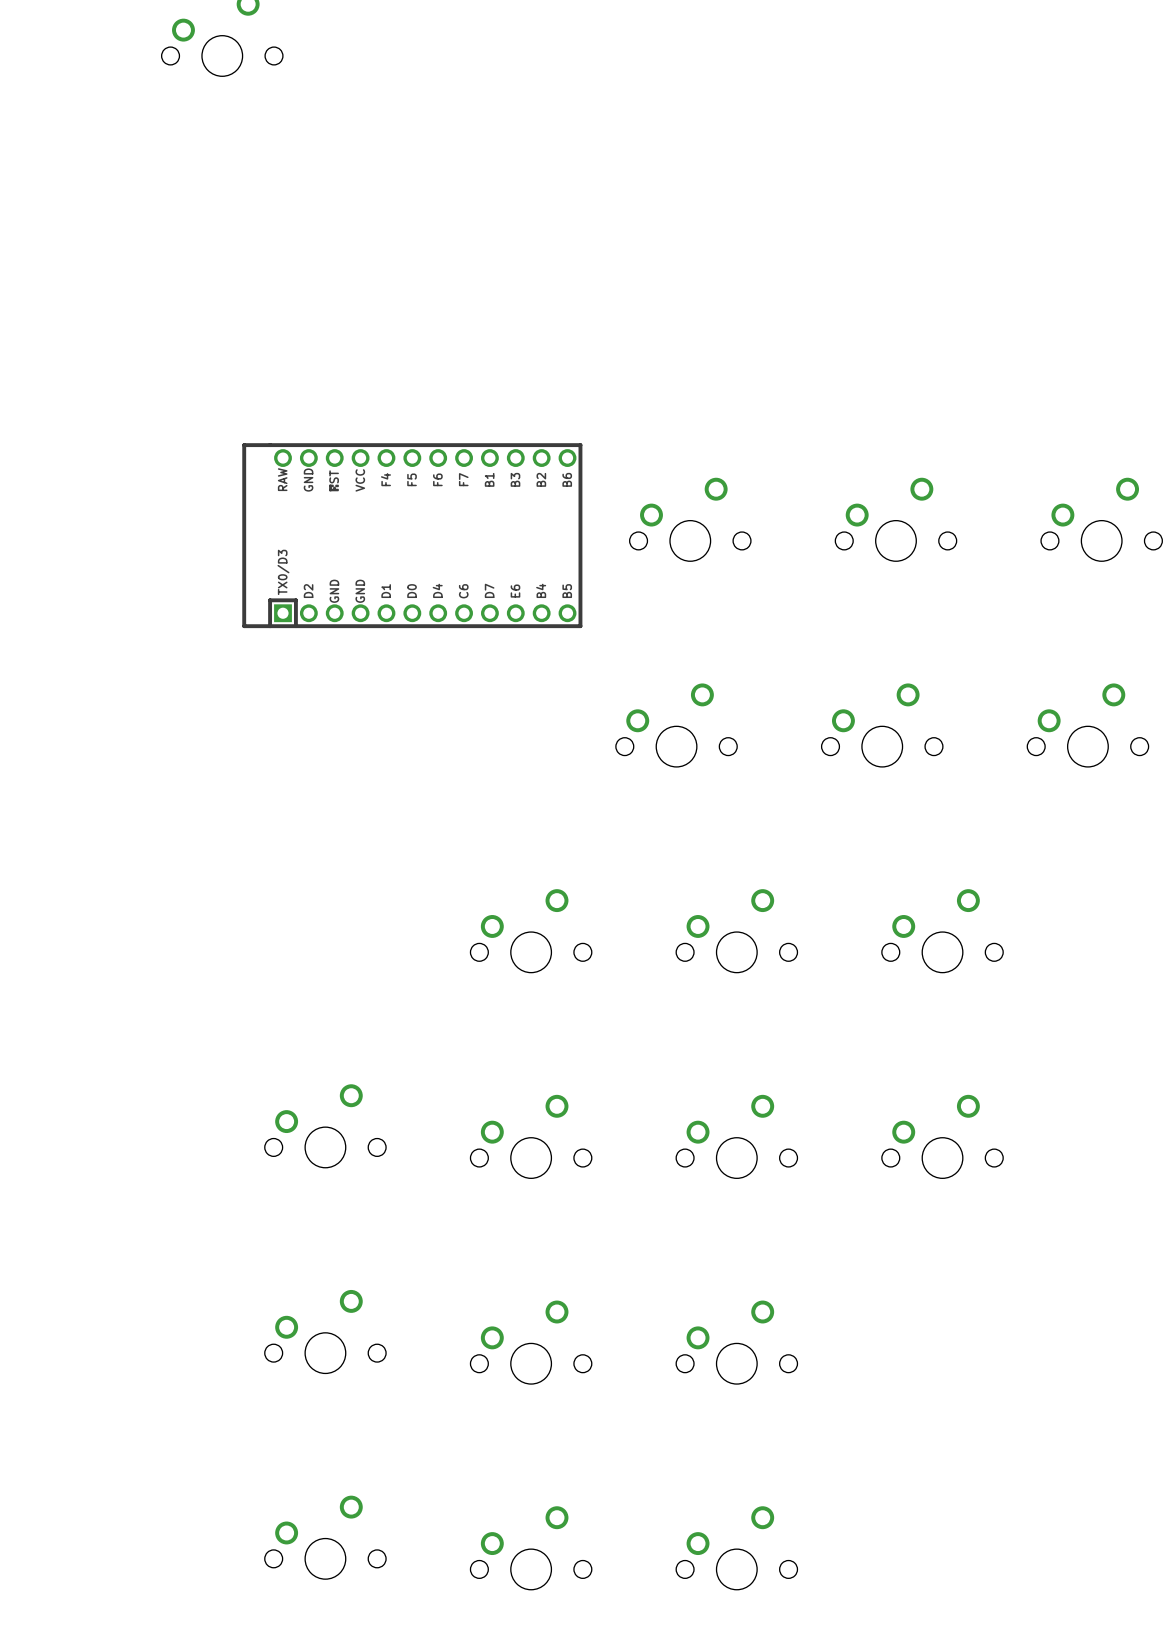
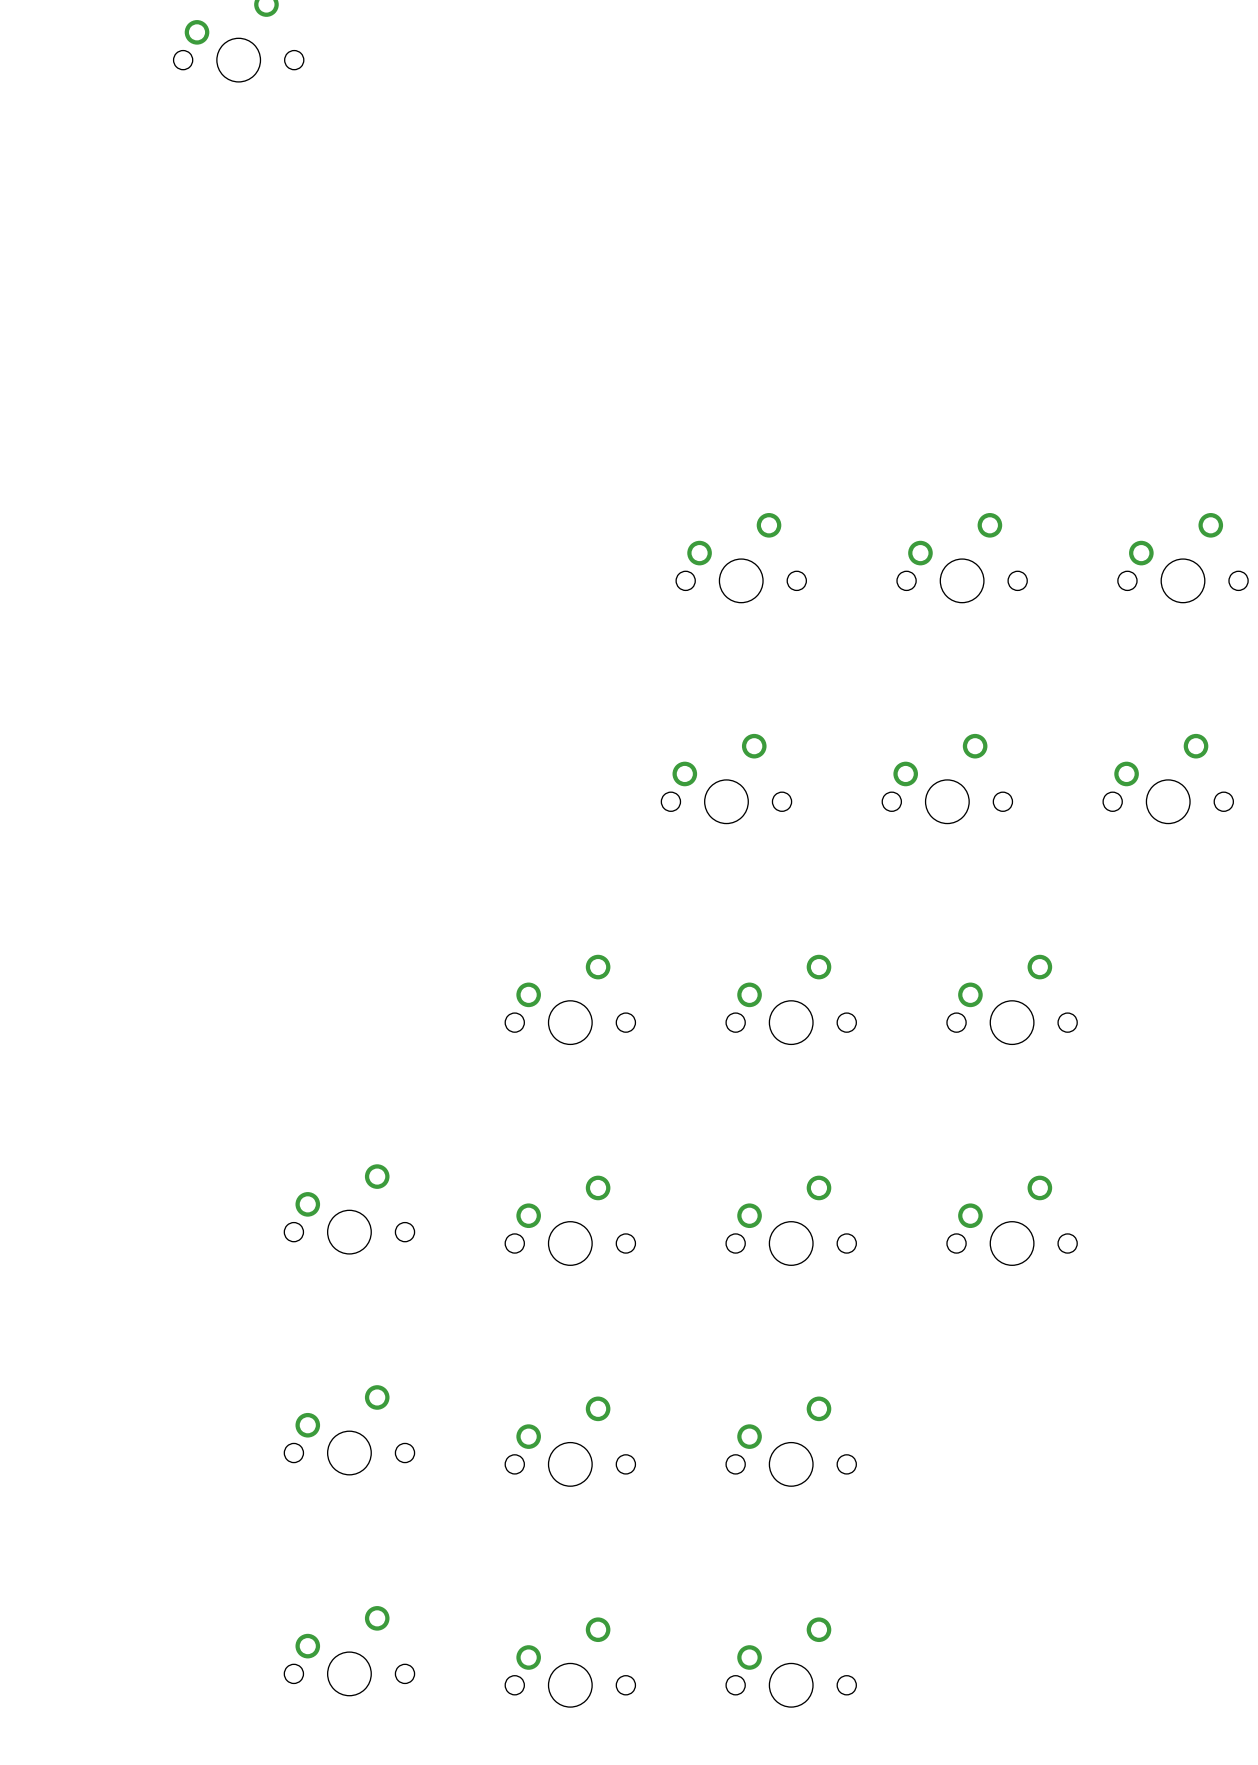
part: (412, 535) -> none

